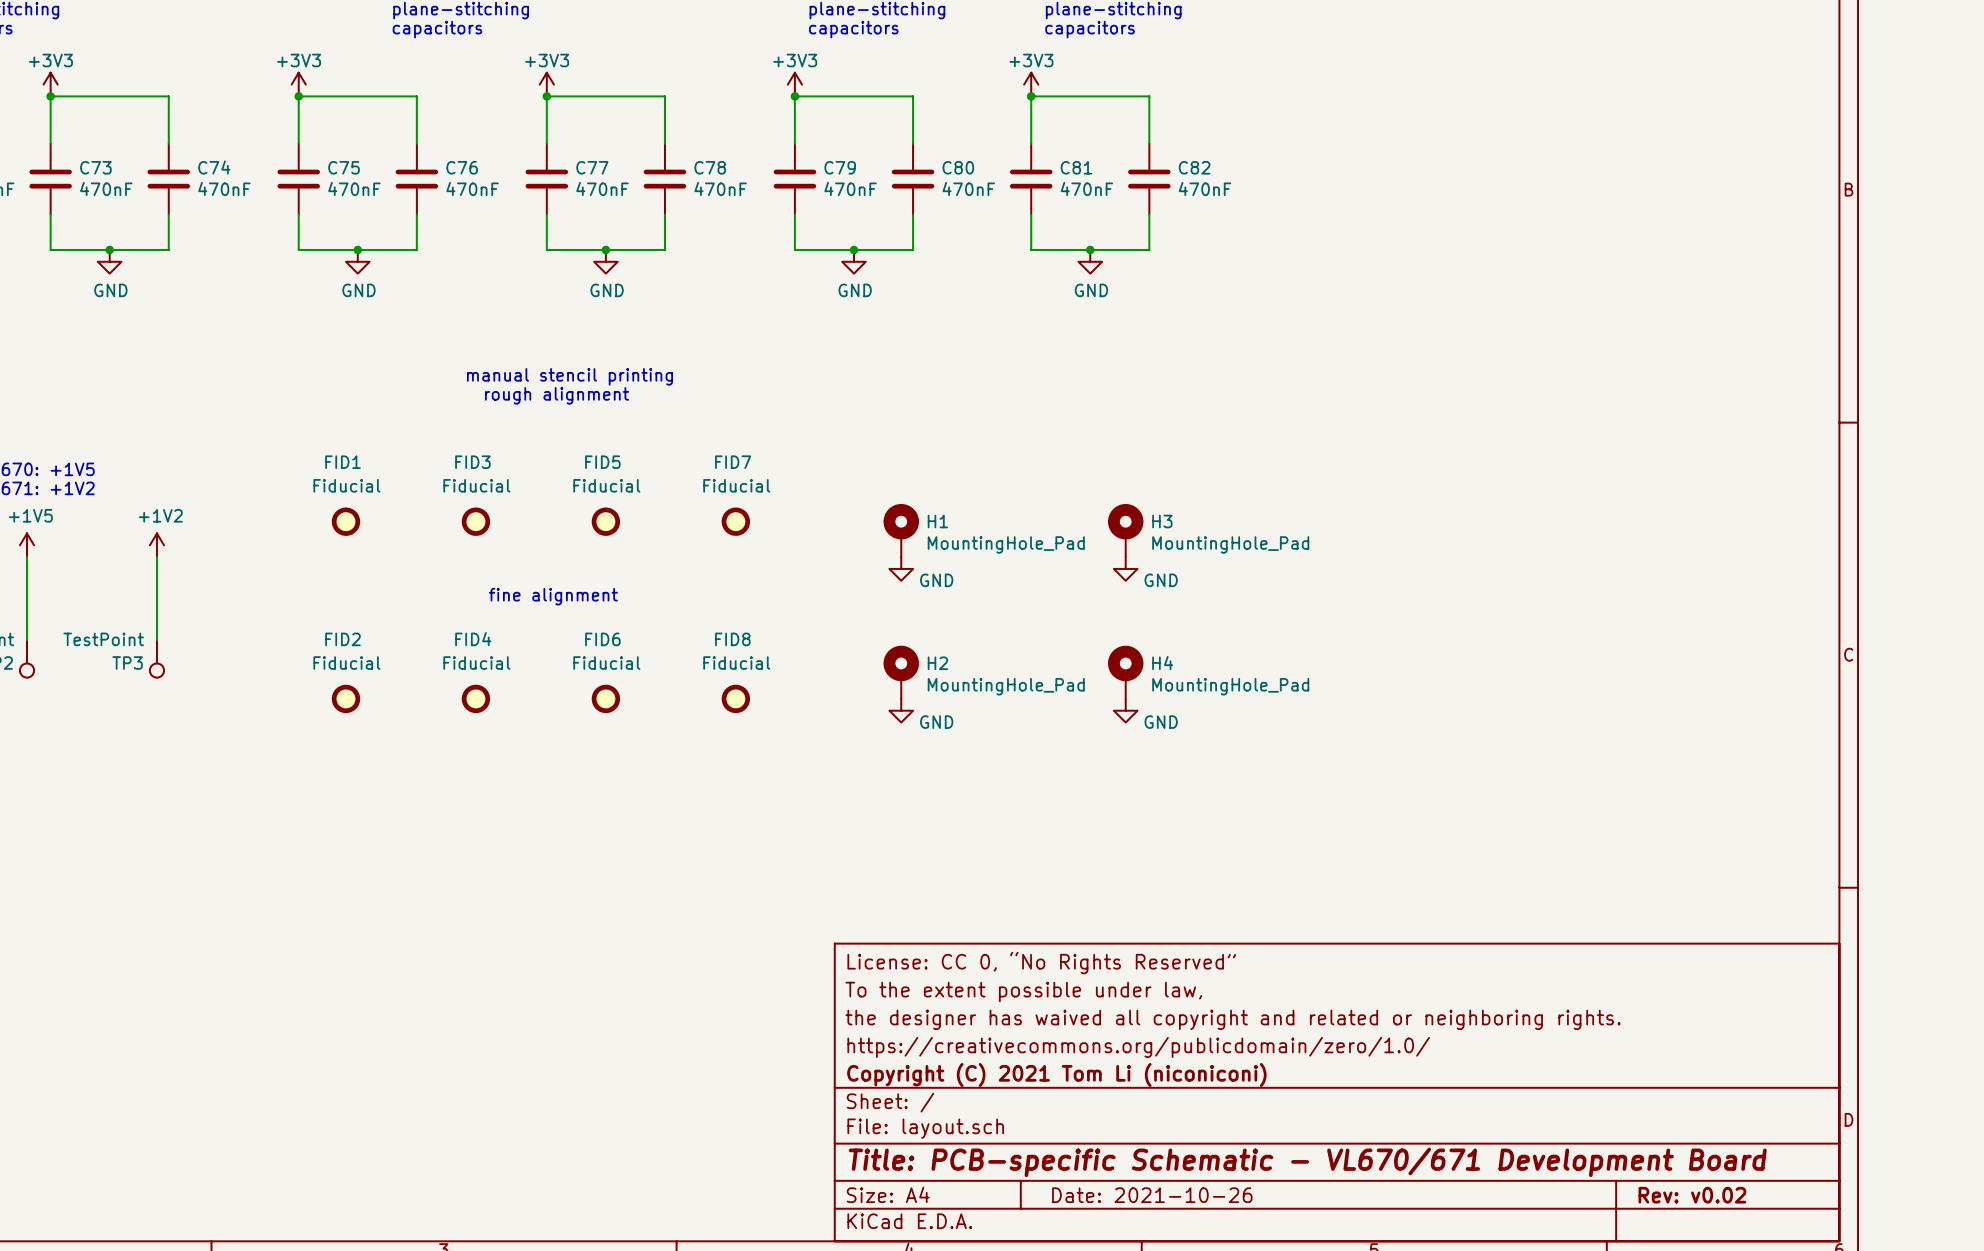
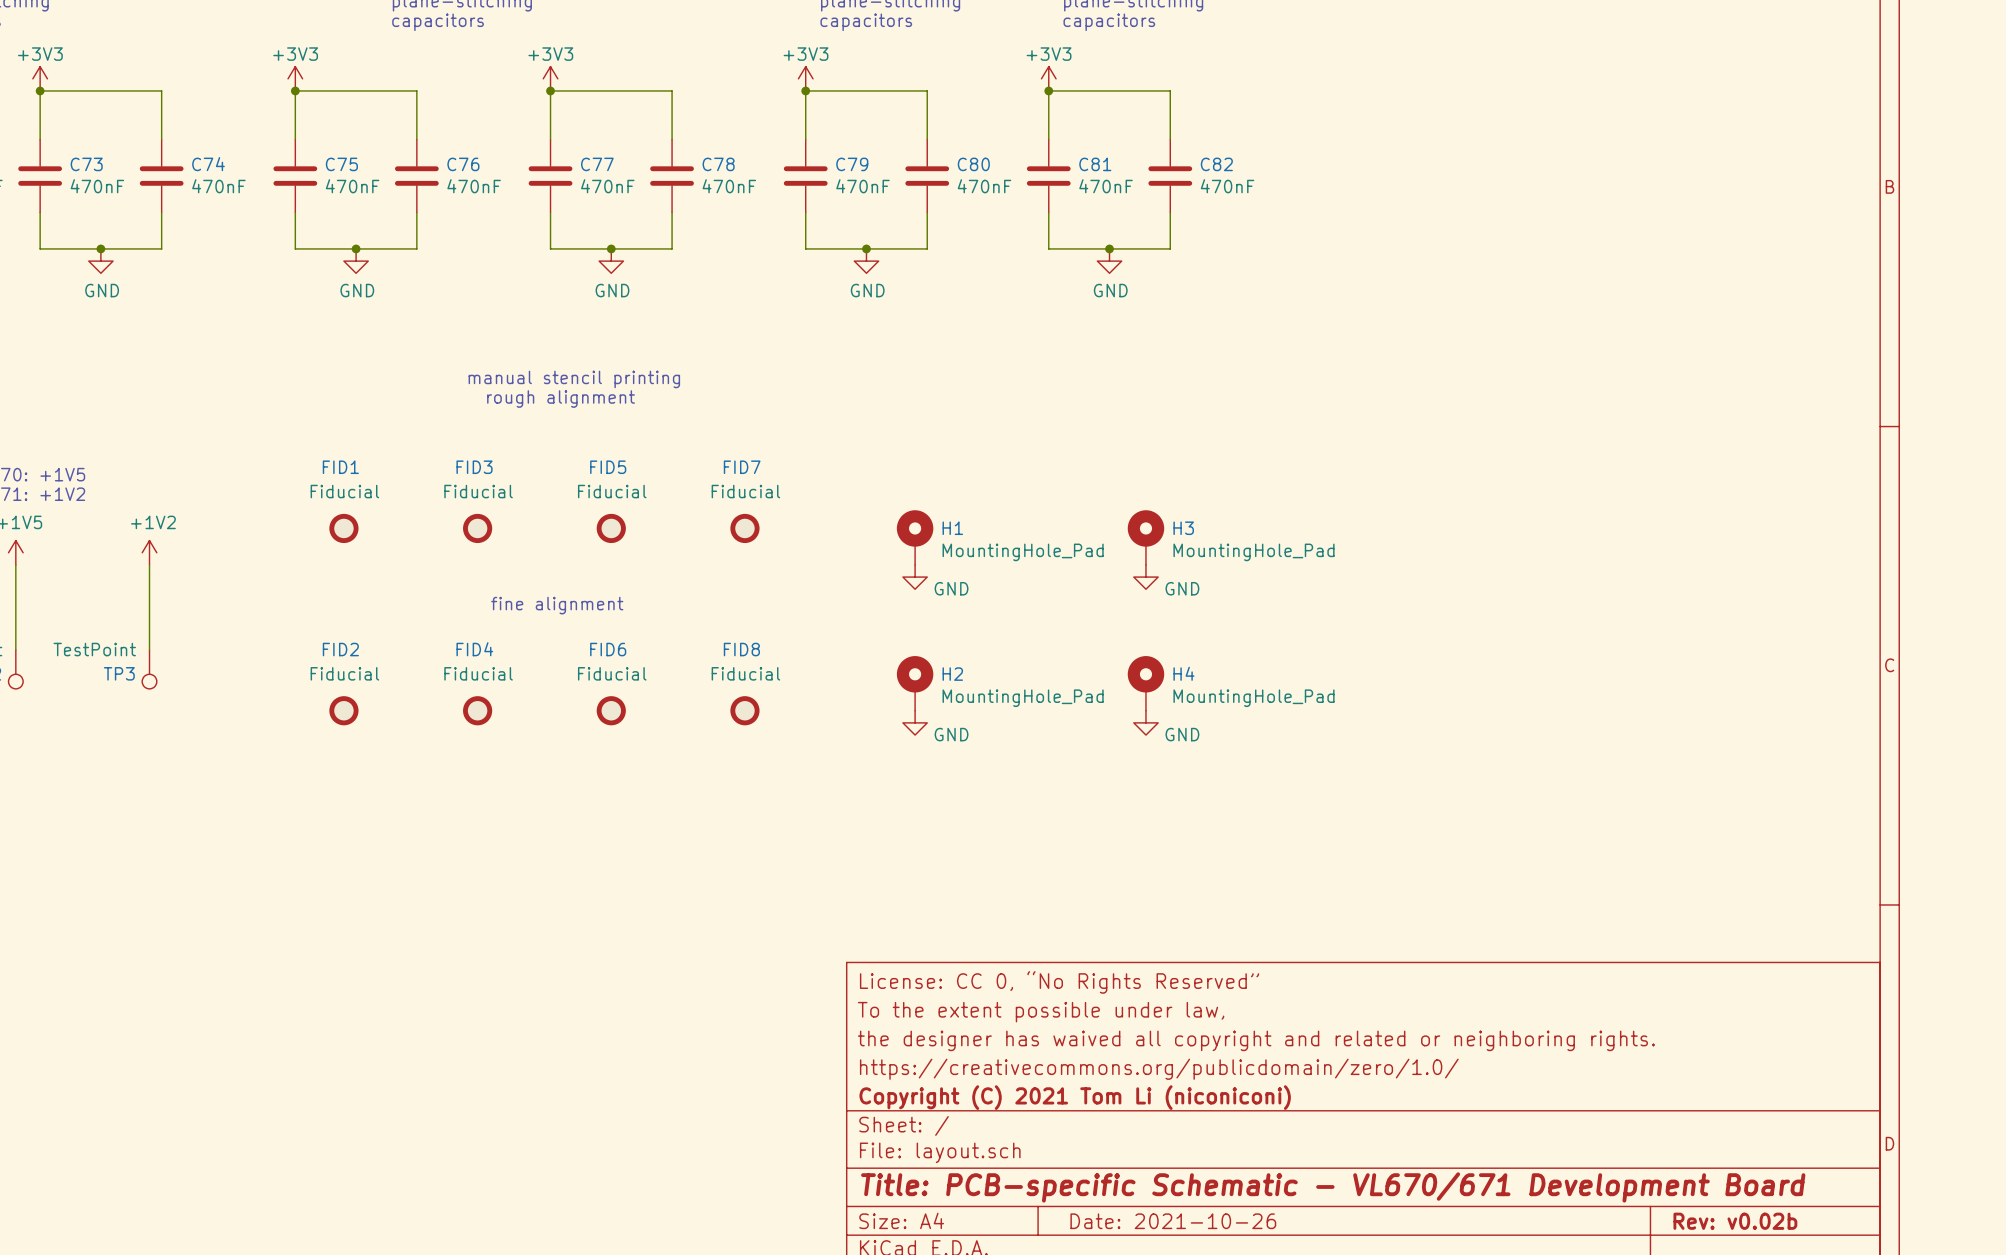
title block: Rev: v0.02 (1692, 1195) -> Rev: v0.02b (1735, 1221)

